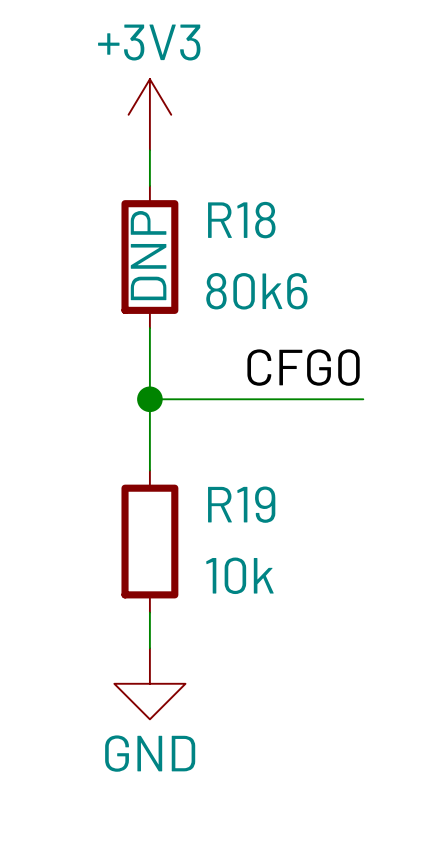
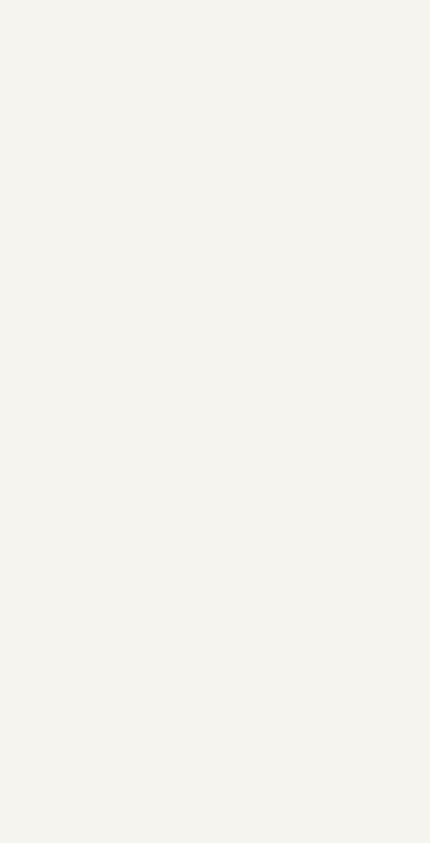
power symbol: +3V3 (149, 114) -> none
wire: (149, 150) (149, 185) -> none
R18: (149, 257) -> none
wire: (149, 328) (149, 470) -> none
label: CFG0 (303, 367) -> none
wire: (149, 399) (363, 399) -> none
junction: (149, 399) -> none
R19: (149, 541) -> none
wire: (149, 612) (149, 648) -> none
power symbol: GND (149, 683) -> none

